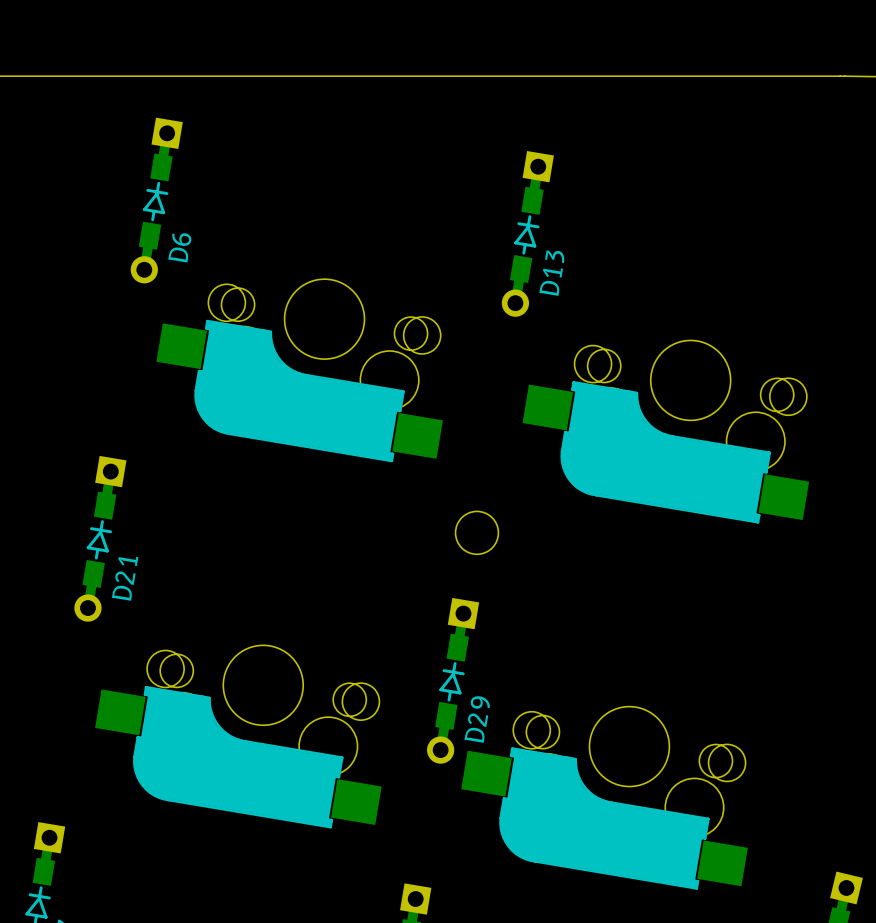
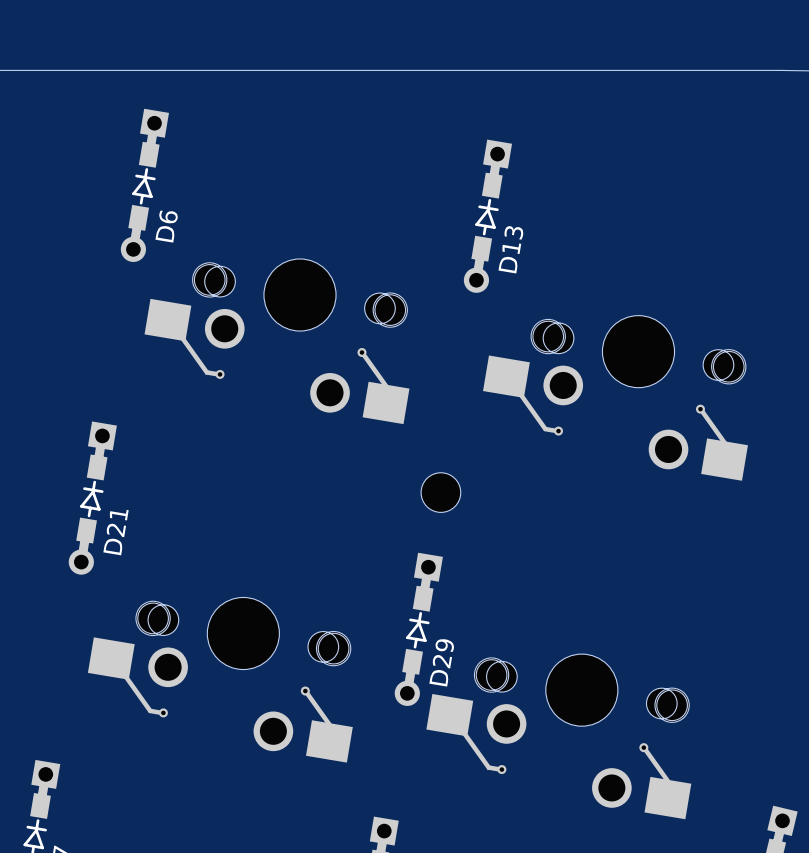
part footprint: [156, 279, 443, 463] -> [144, 258, 410, 425]
part footprint: [522, 340, 810, 524] -> [483, 315, 748, 481]
part footprint: [95, 645, 382, 829] -> [87, 597, 353, 763]
part footprint: [461, 706, 748, 890] -> [426, 654, 692, 820]

